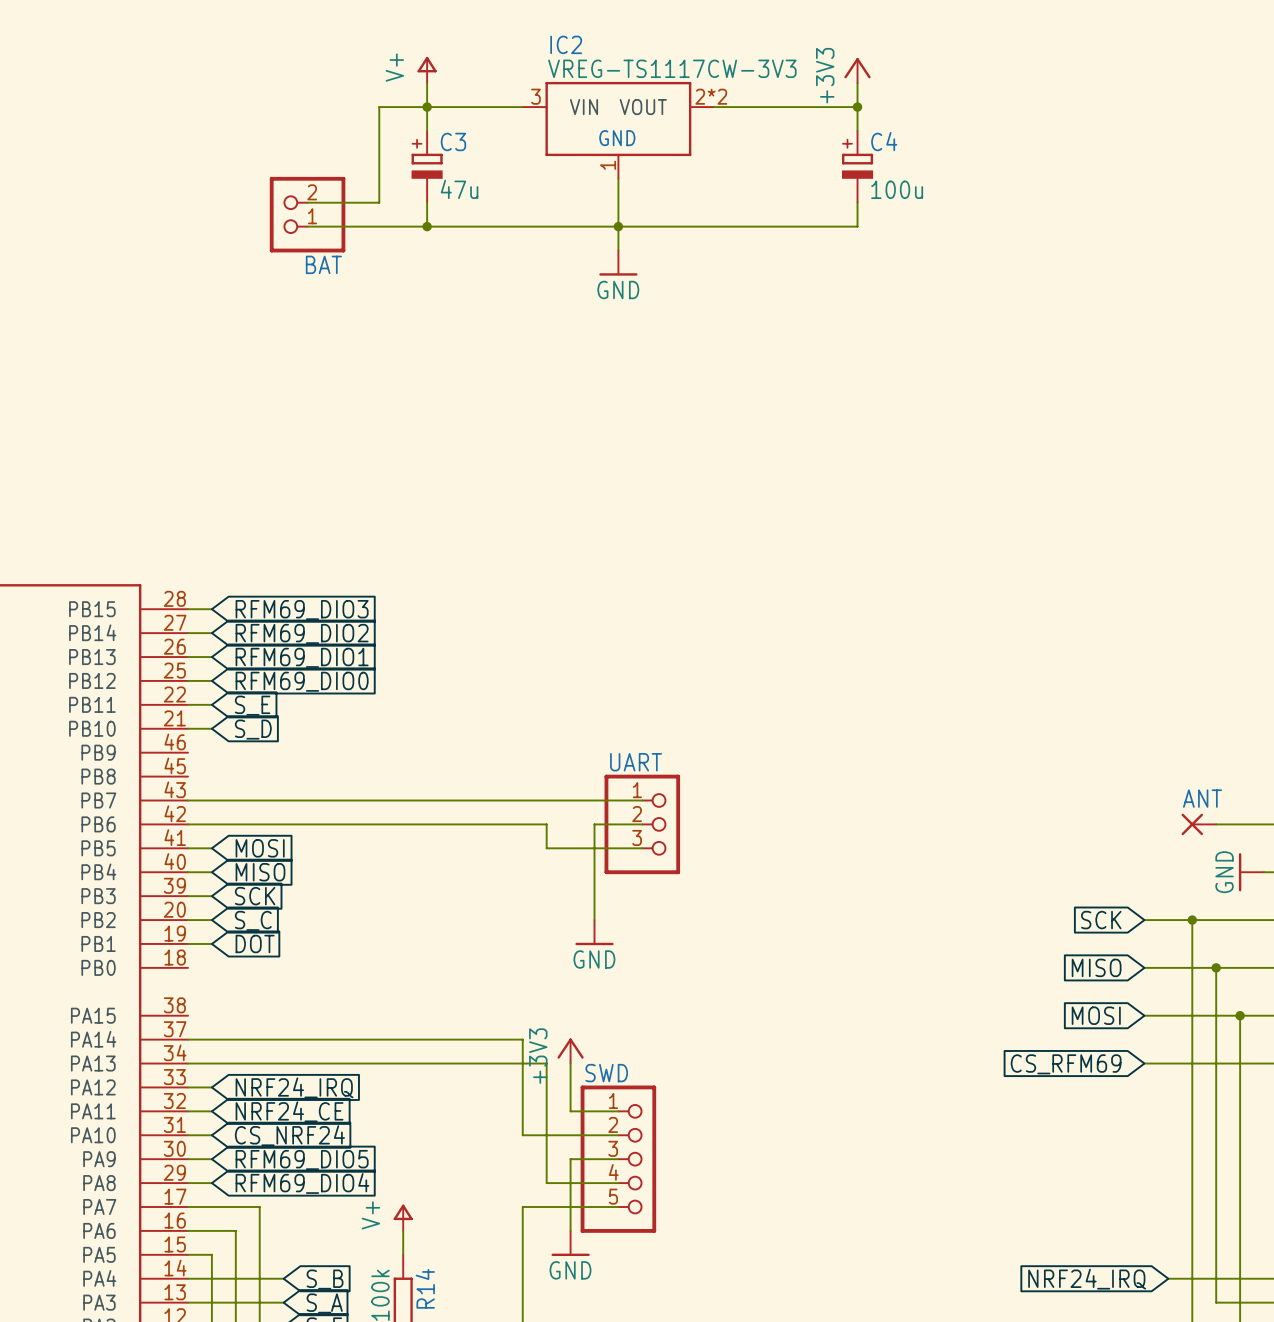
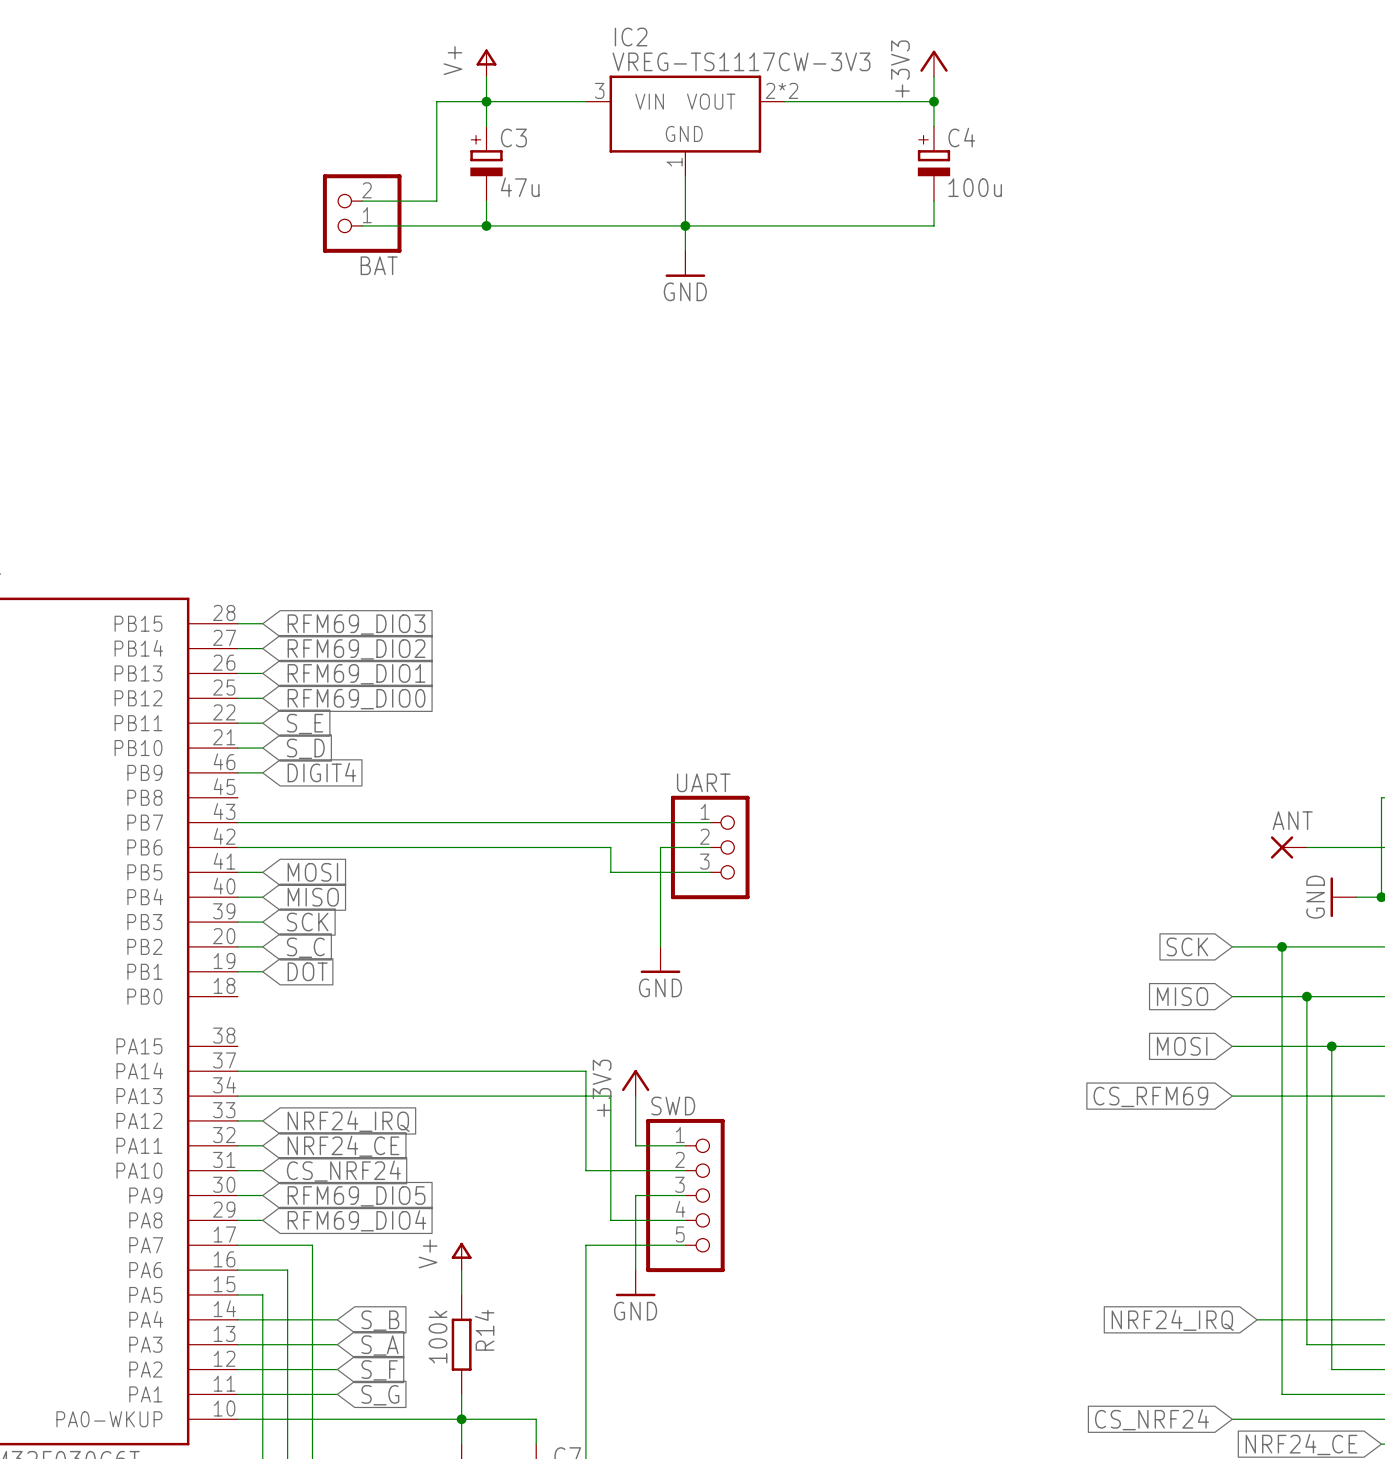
wire: none -> (237, 772) (262, 772)
global label: none -> DIGIT4 (321, 772)

